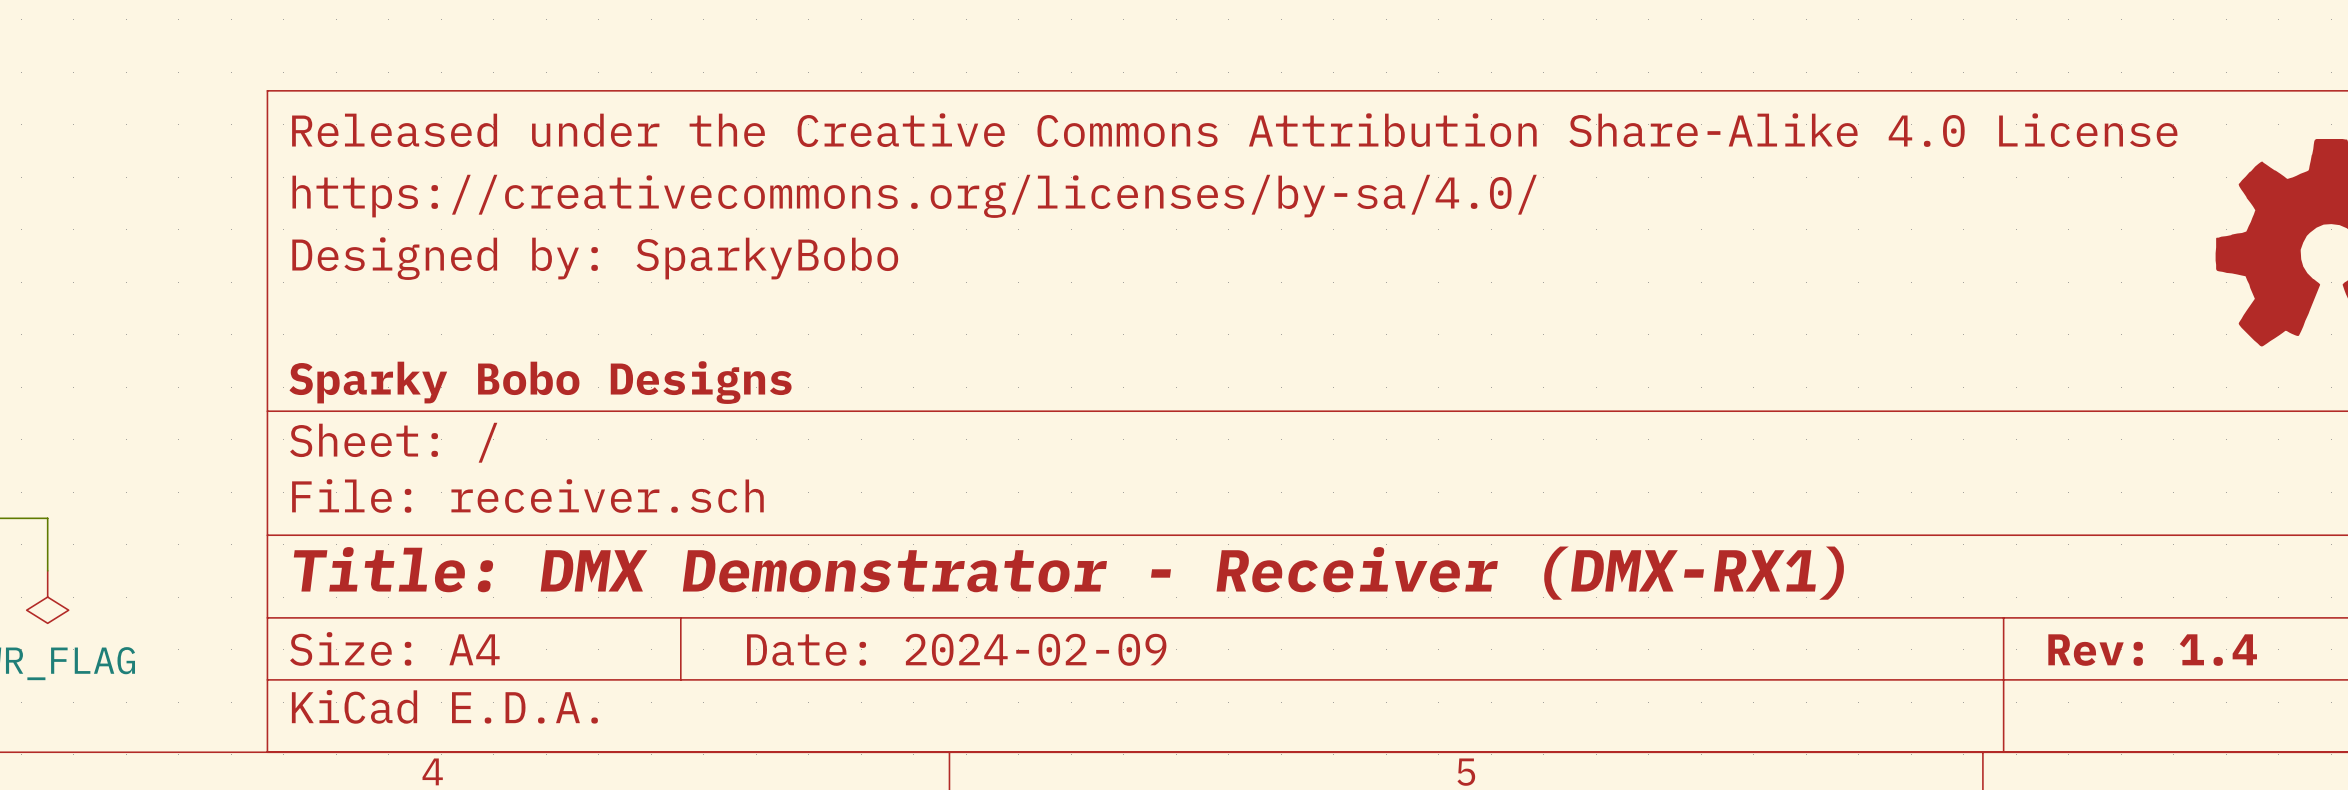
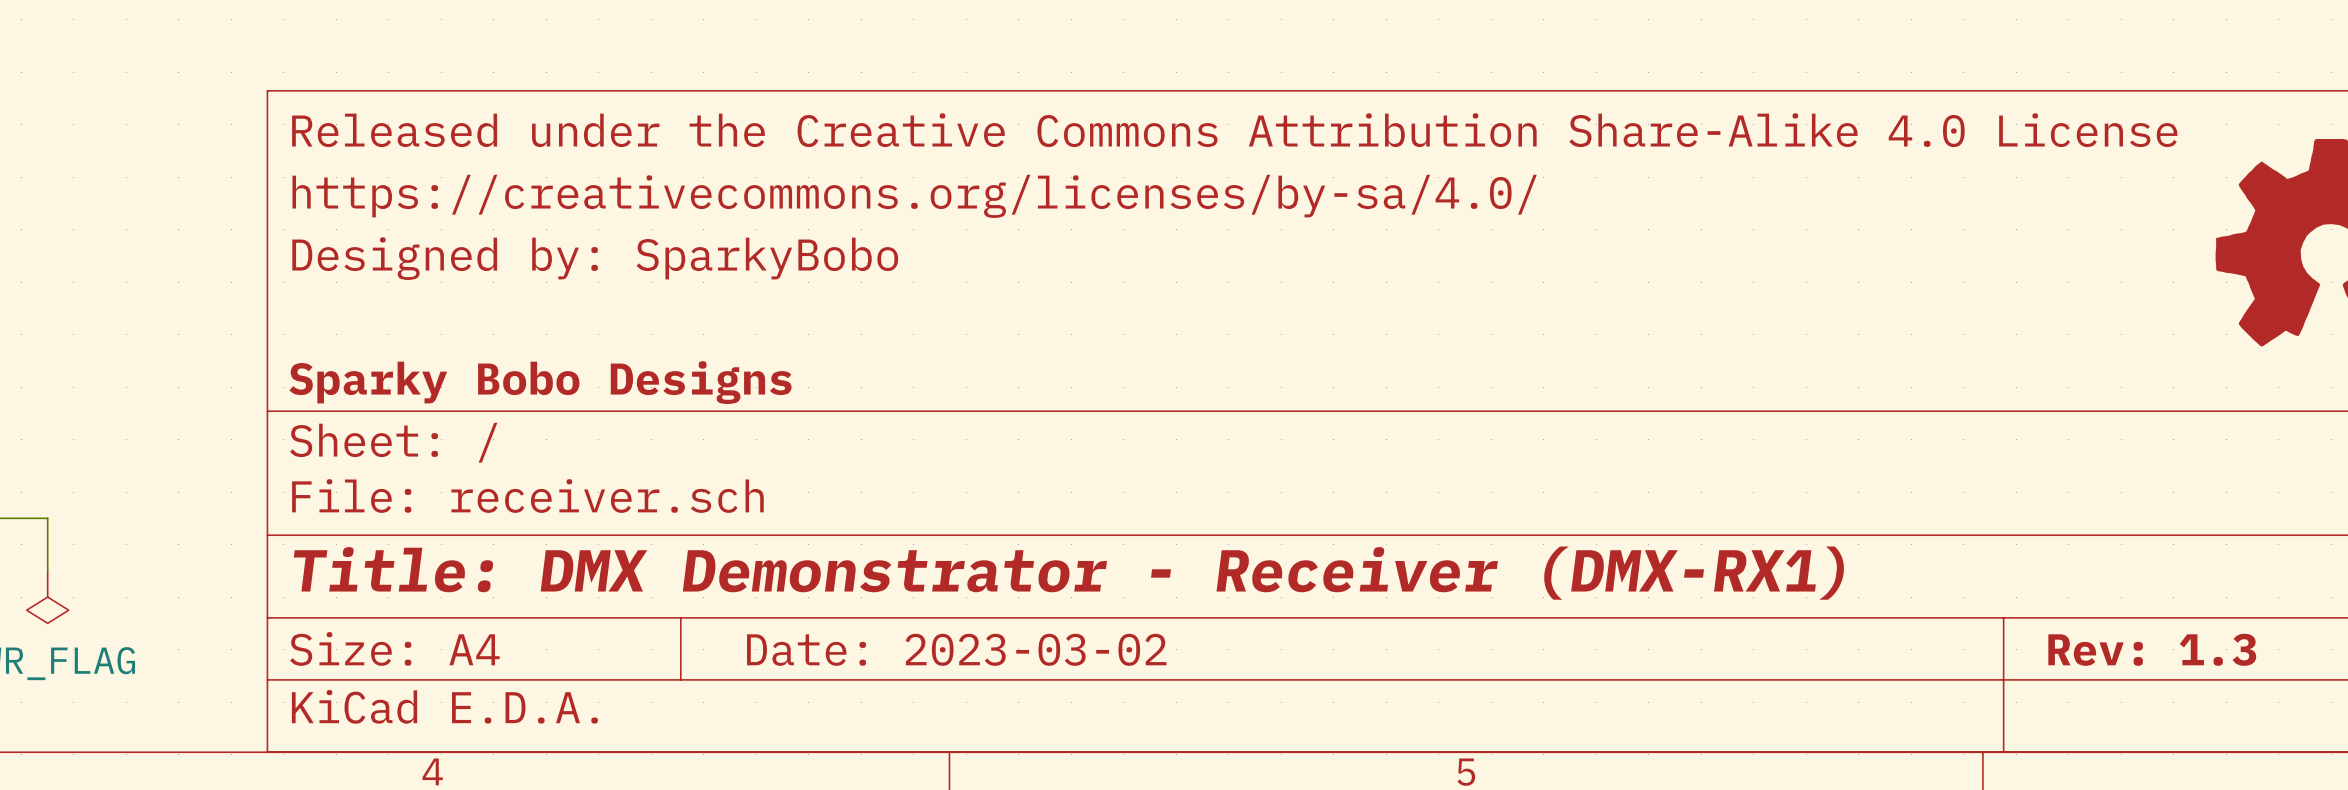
title block: Date: 2024-02-09 (956, 649) -> Date: 2023-03-02 (956, 649)
title block: Rev: 1.4 (2152, 650) -> Rev: 1.3 (2152, 649)

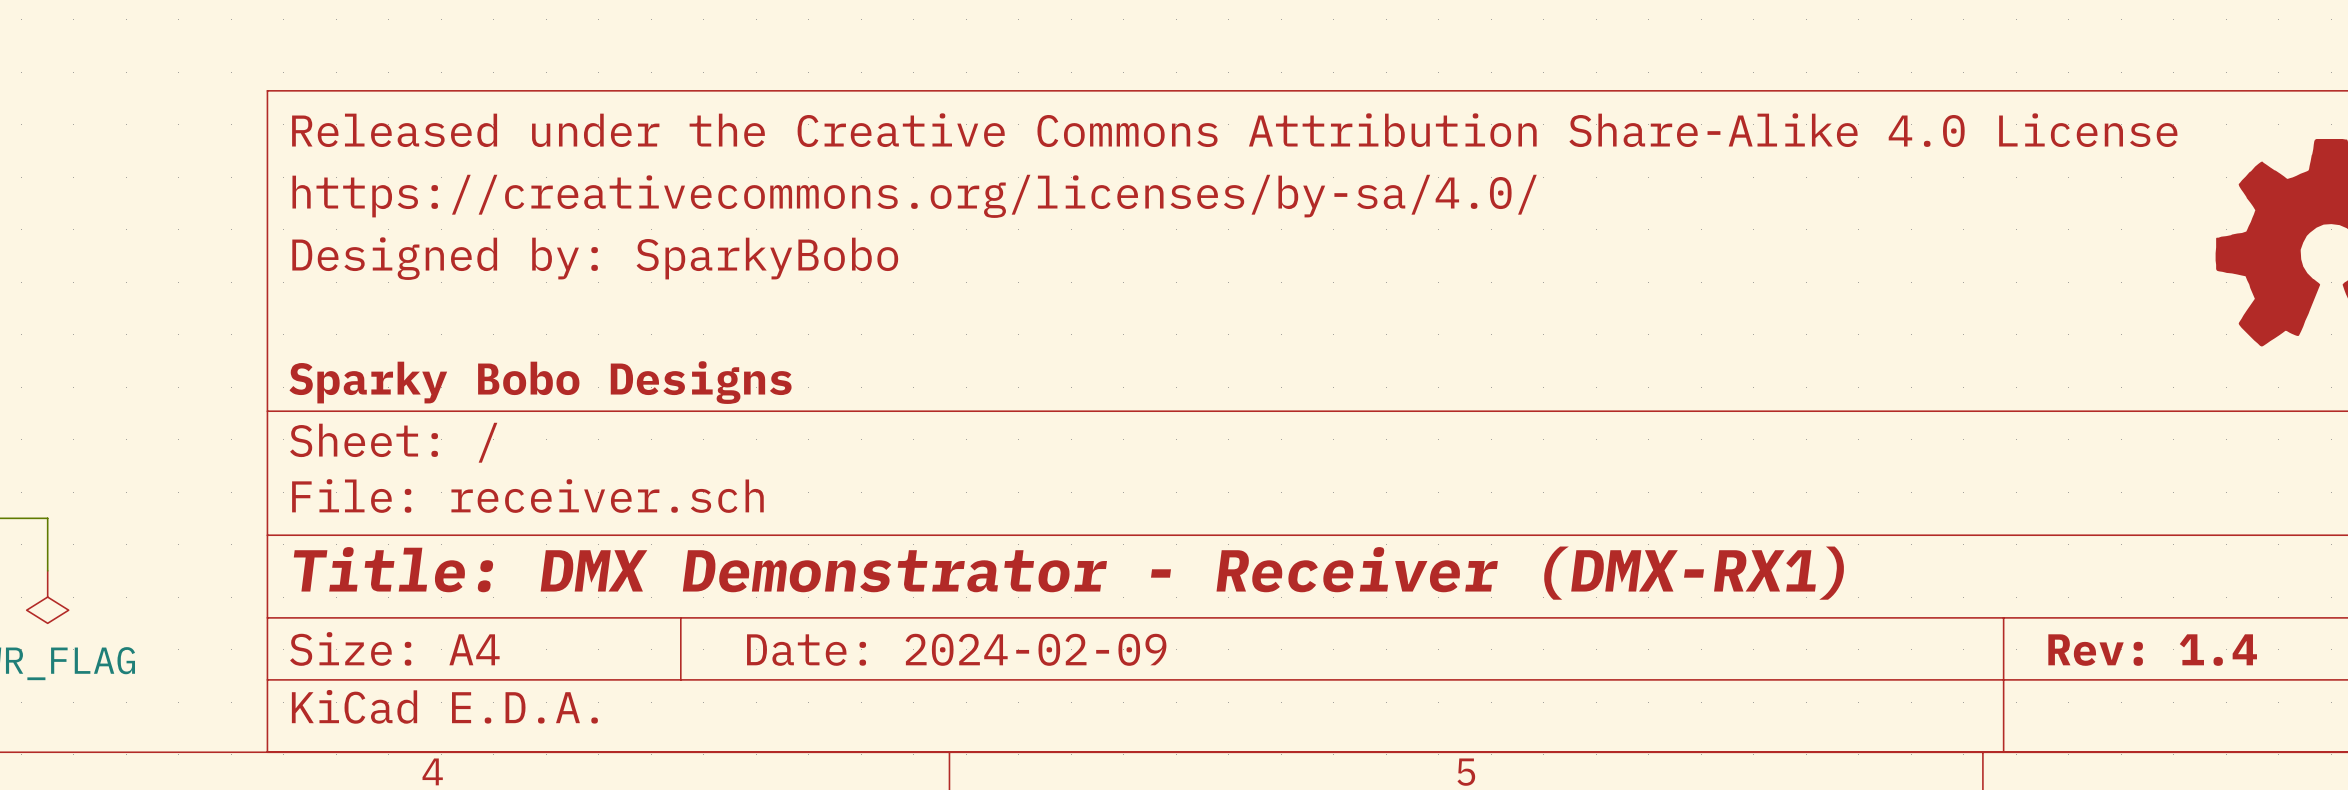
title block: Date: 2023-03-02 (956, 649) -> Date: 2024-02-09 (956, 649)
title block: Rev: 1.3 (2152, 649) -> Rev: 1.4 (2152, 650)

